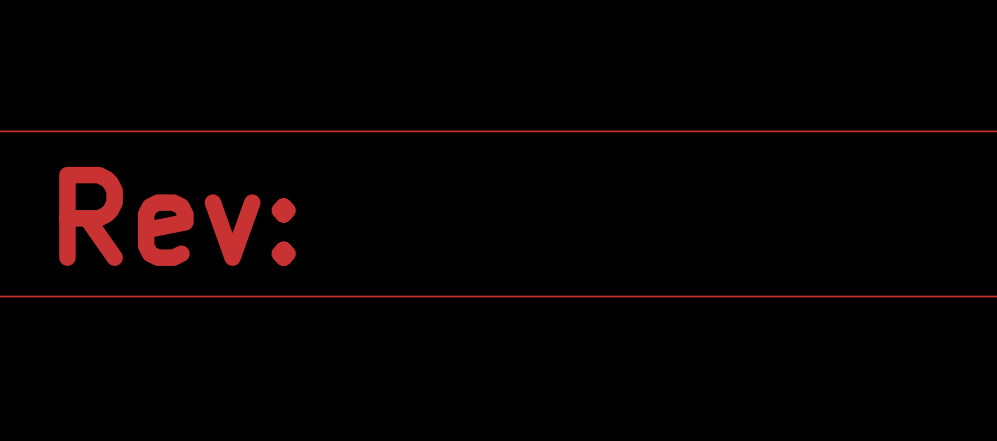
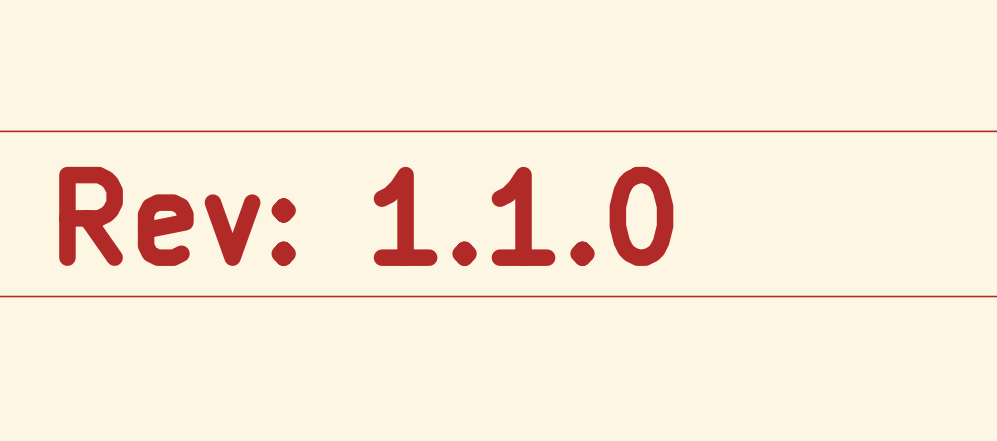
title block: Rev: (177, 216) -> Rev: 1.1.0 (366, 216)

